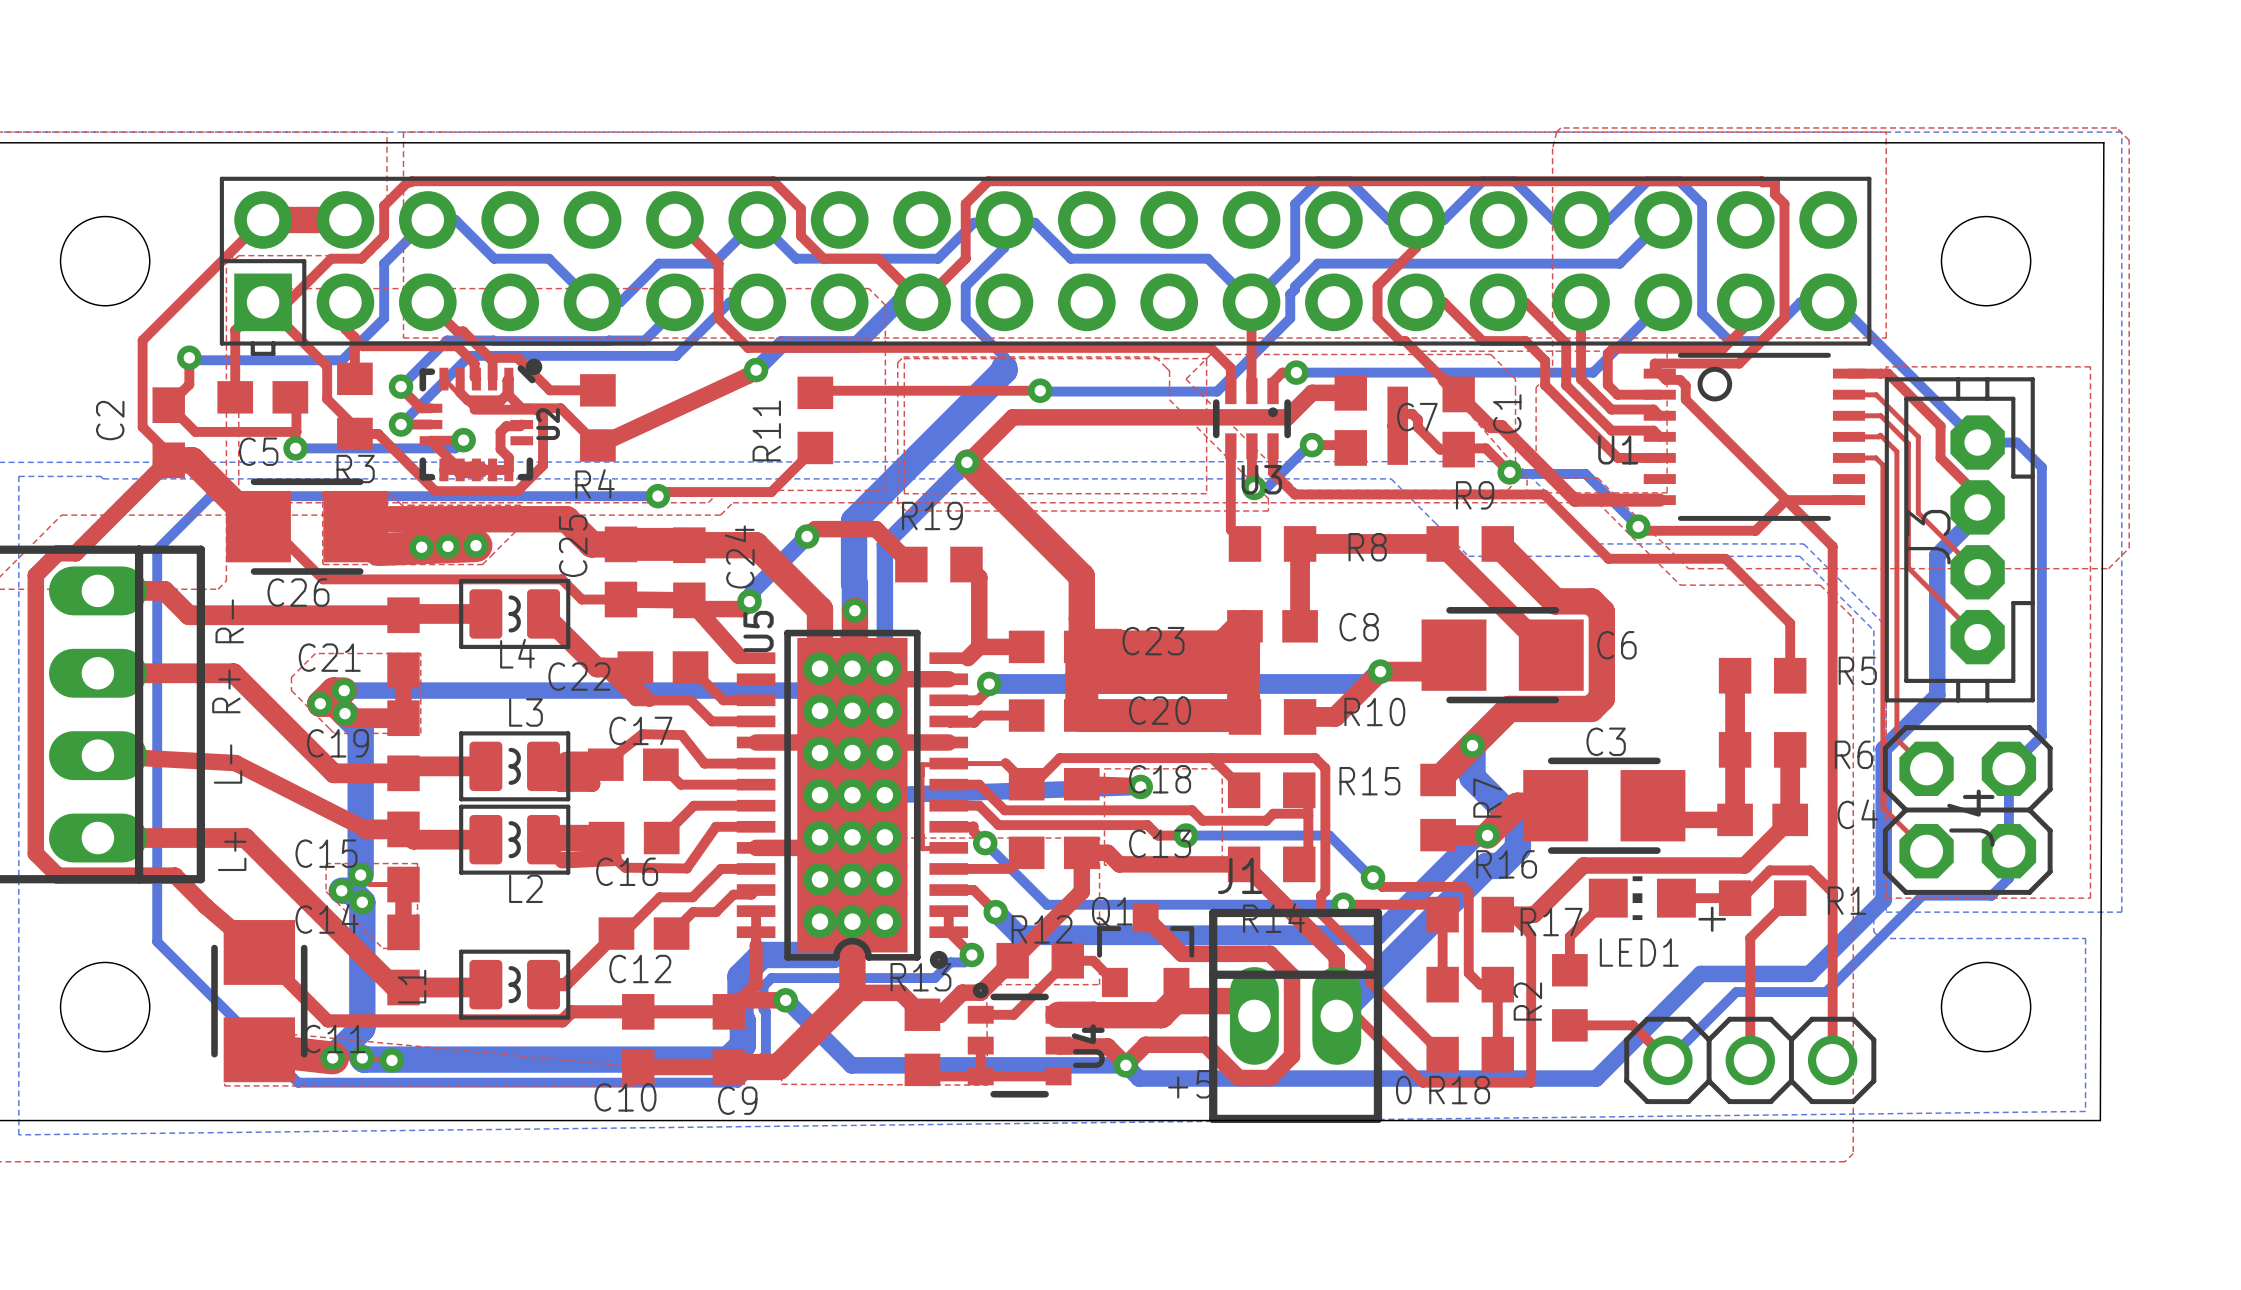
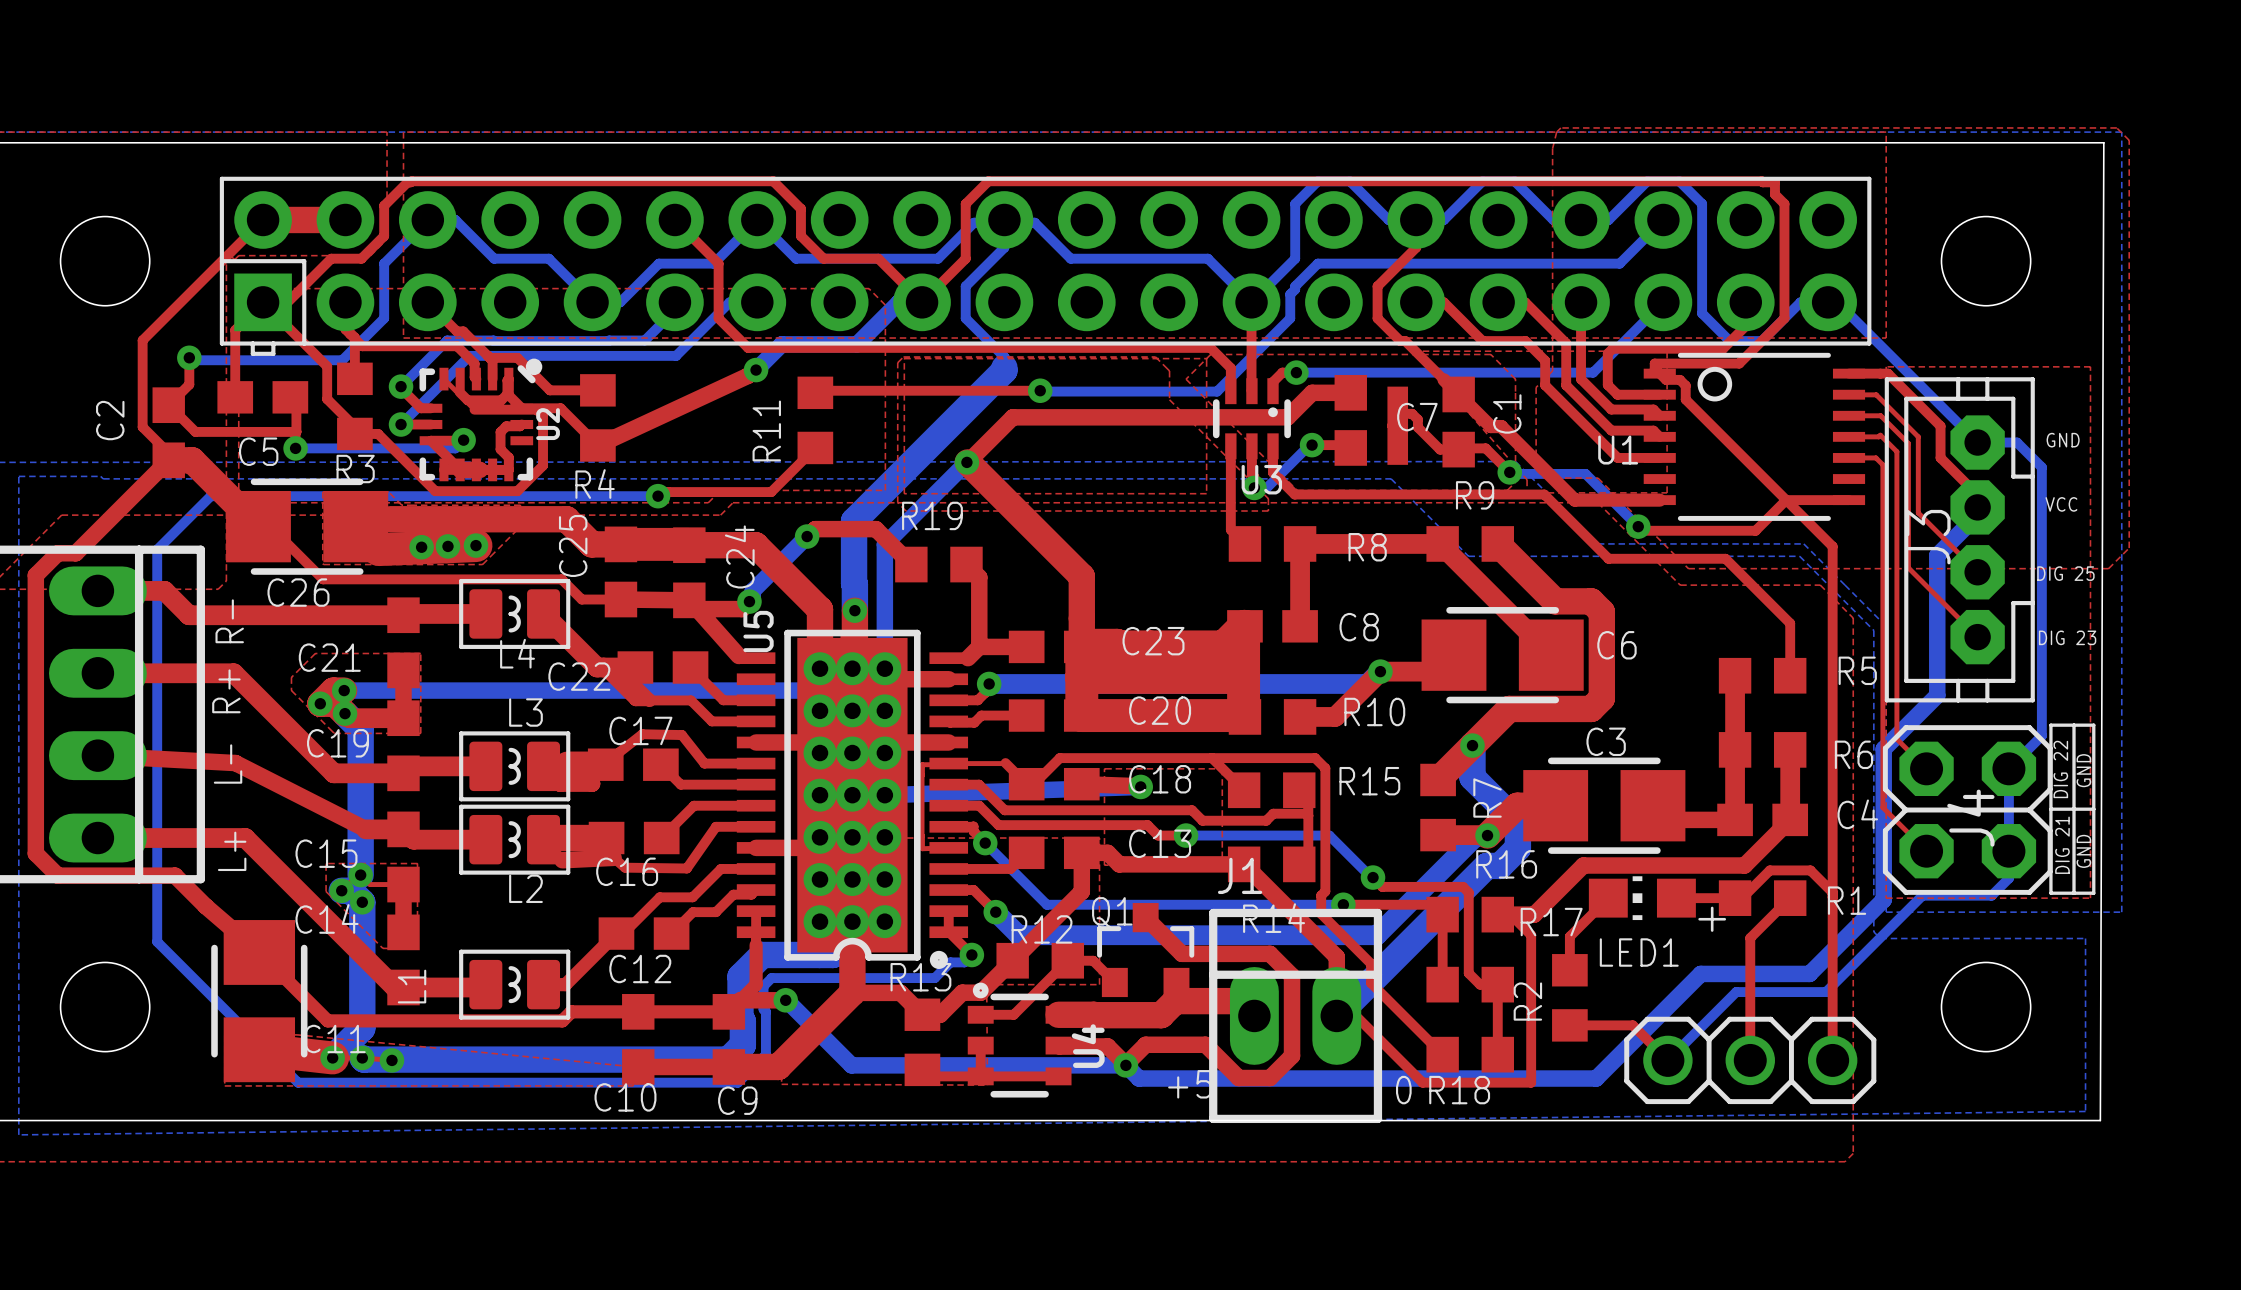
text: none -> GND (2063, 440)
text: none -> VCC (2061, 504)
text: none -> DIG 25 (2065, 573)
text: none -> DIG 23 (2067, 637)
line: none -> (2050, 725) (2093, 725) (2093, 893) (2050, 893) (2050, 725)
line: none -> (2074, 725) (2074, 893)
text: none -> DIG 22 (2060, 769)
text: none -> GND (2083, 770)
line: none -> (2050, 809) (2093, 809)
text: none -> DIG 21 (2062, 845)
text: none -> GND (2083, 851)

